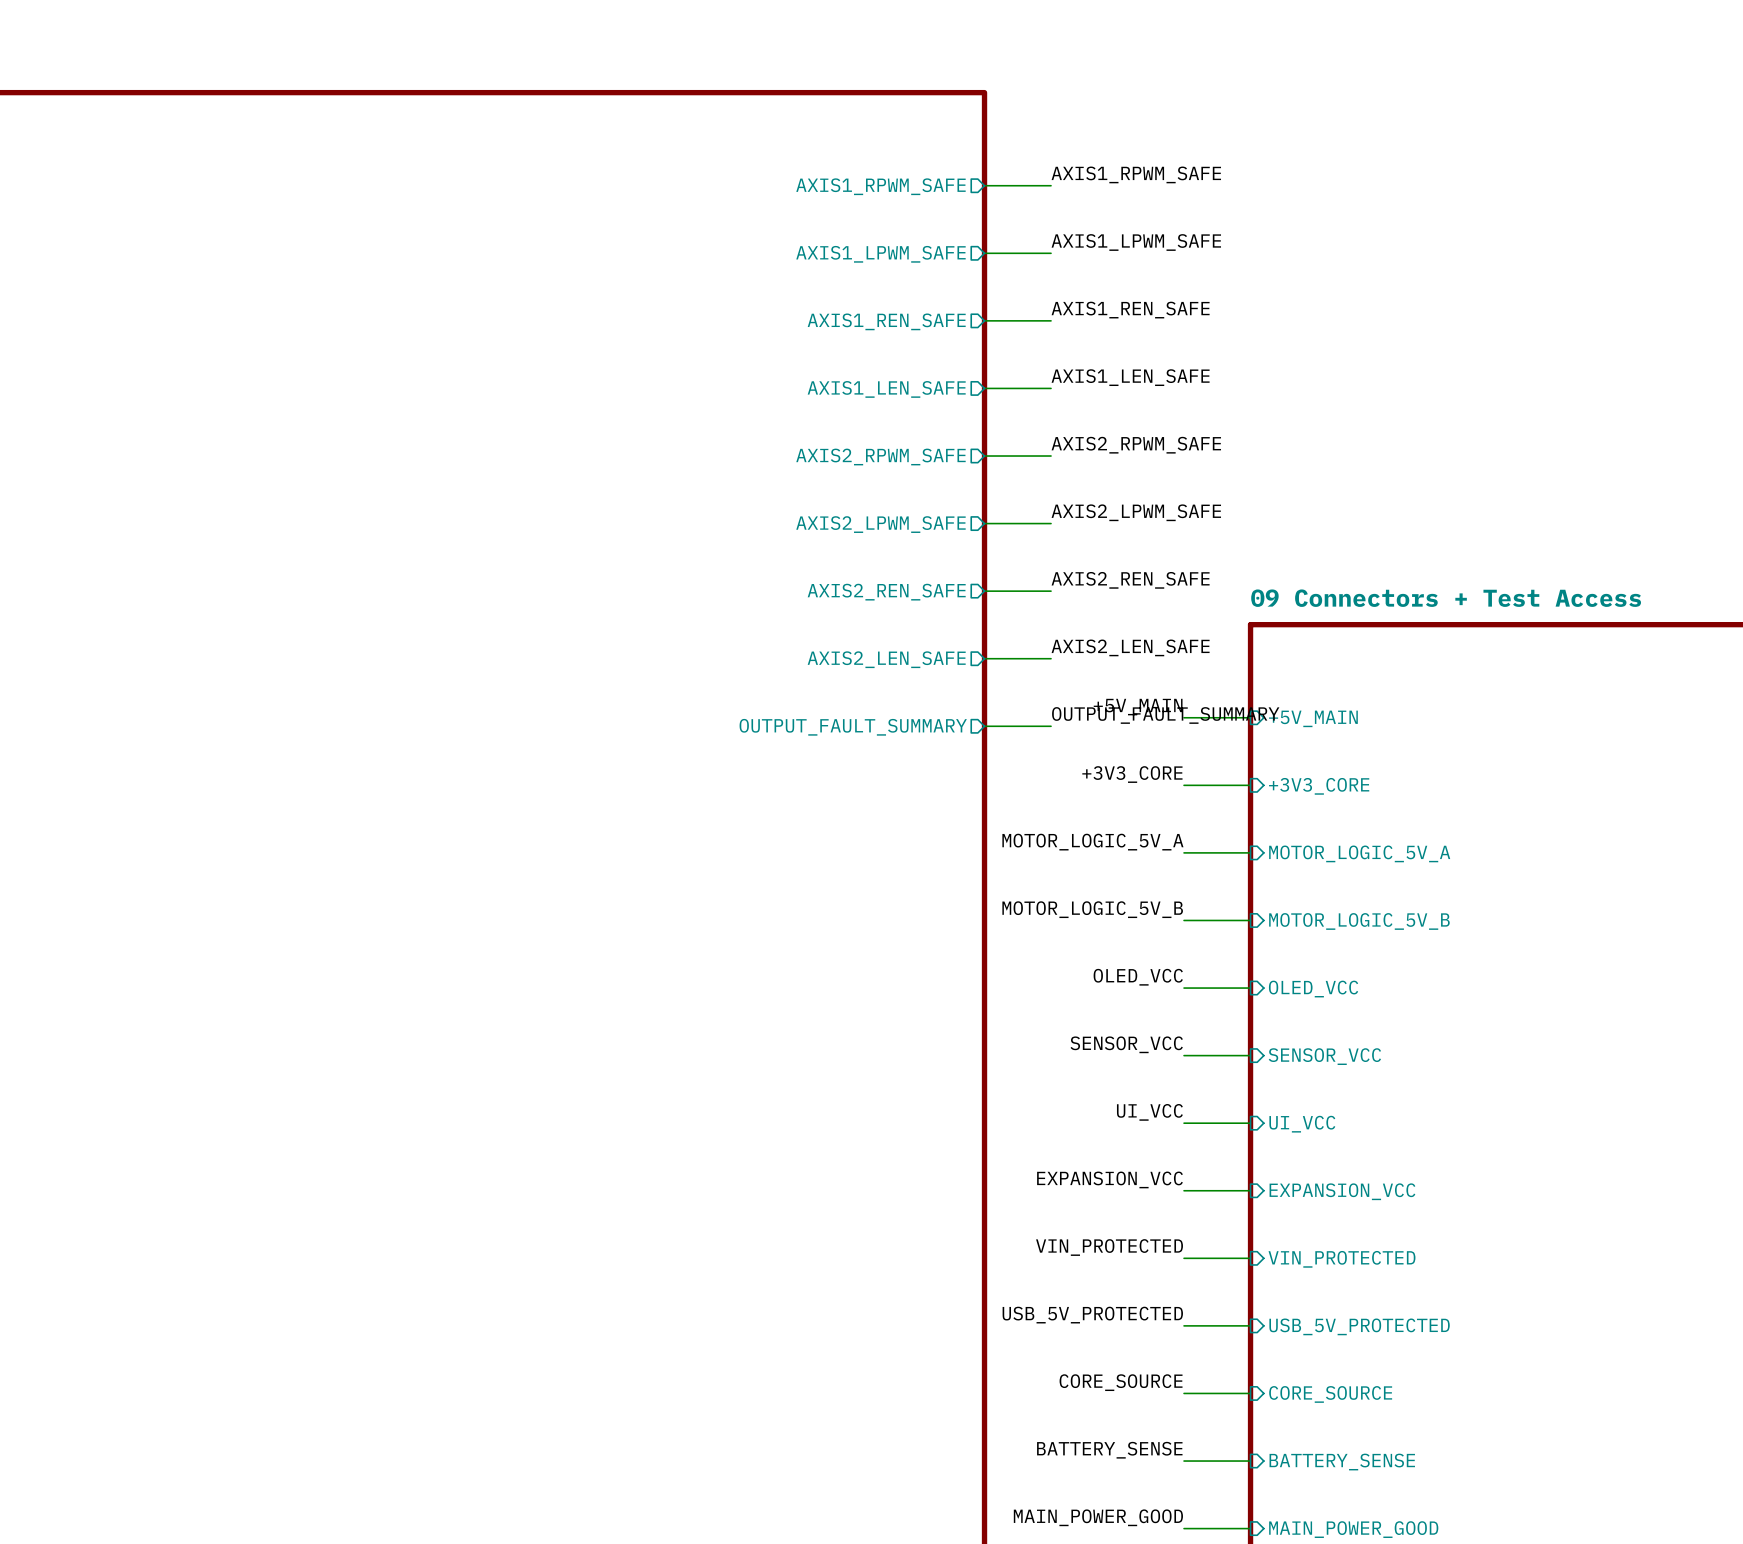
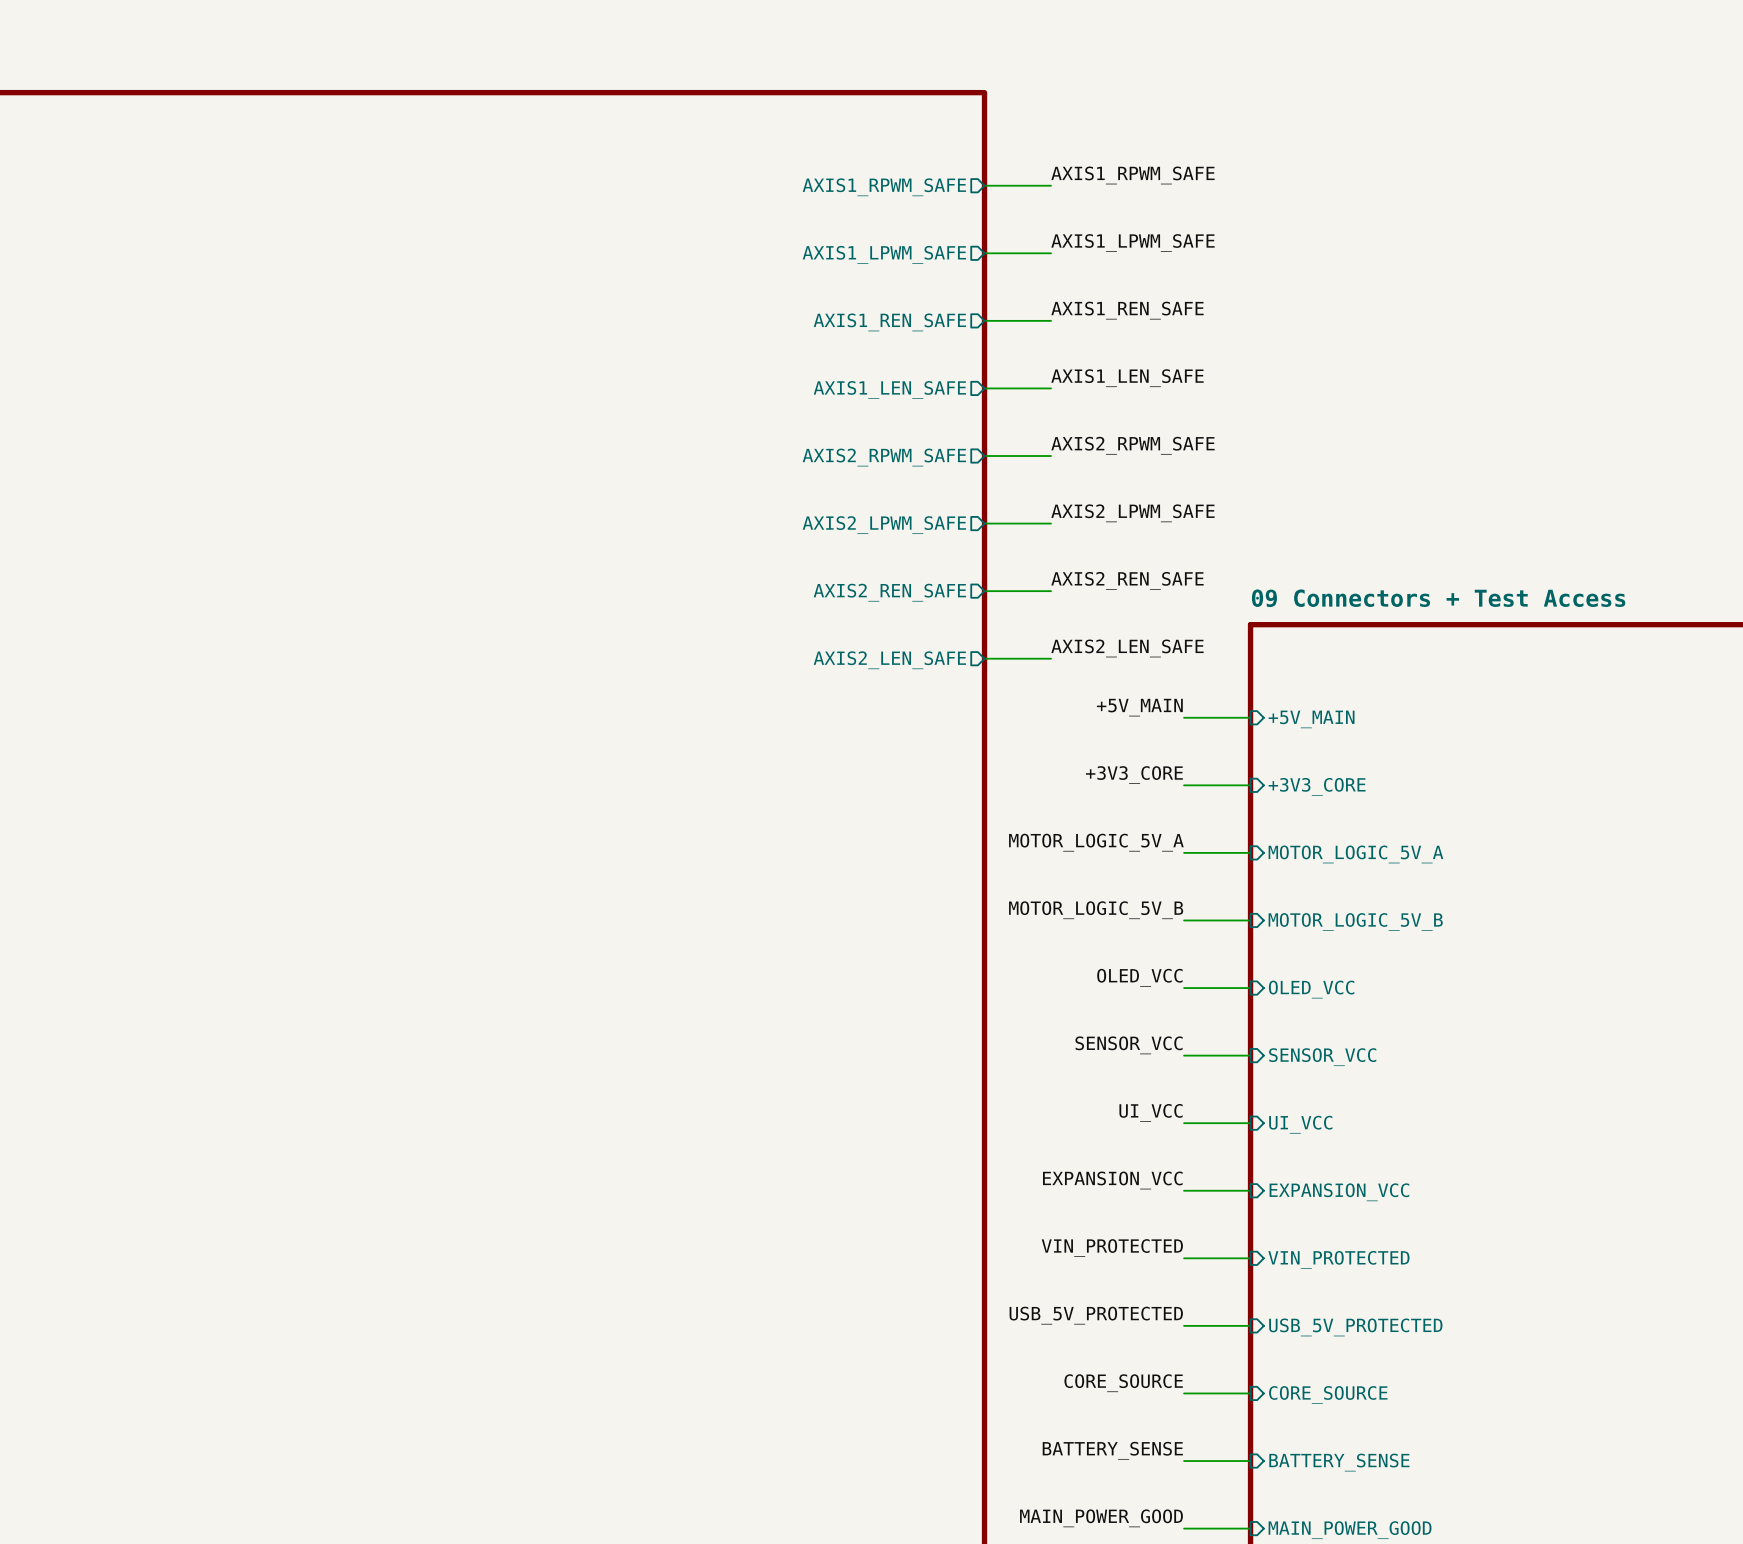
label: OUTPUT_FAULT_SUMMARY (1165, 715) -> none
wire: (984, 726) (1051, 726) -> none
sheet pin: OUTPUT_FAULT_SUMMARY (853, 727) -> none

